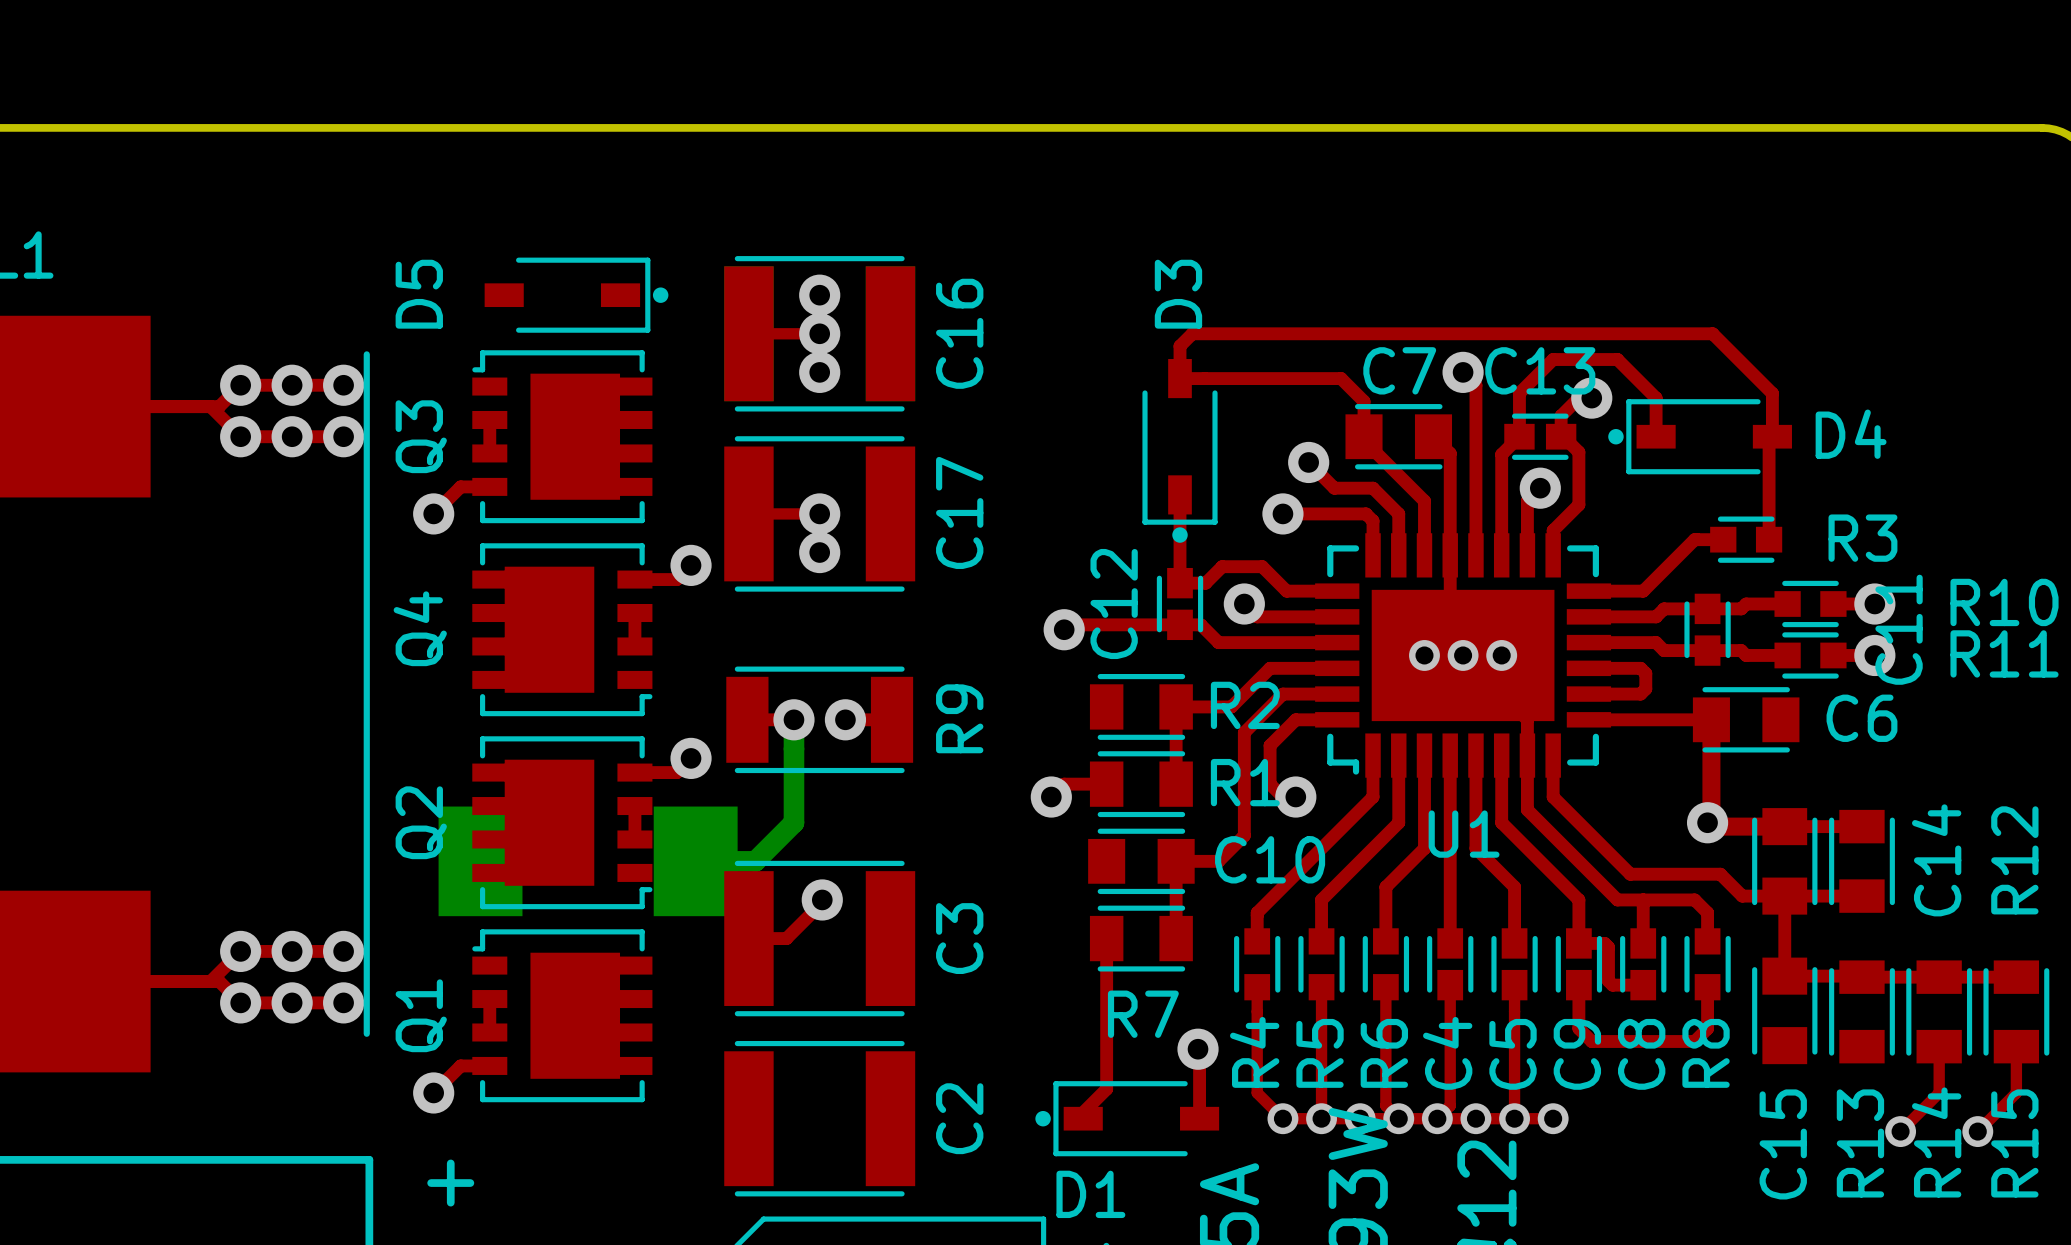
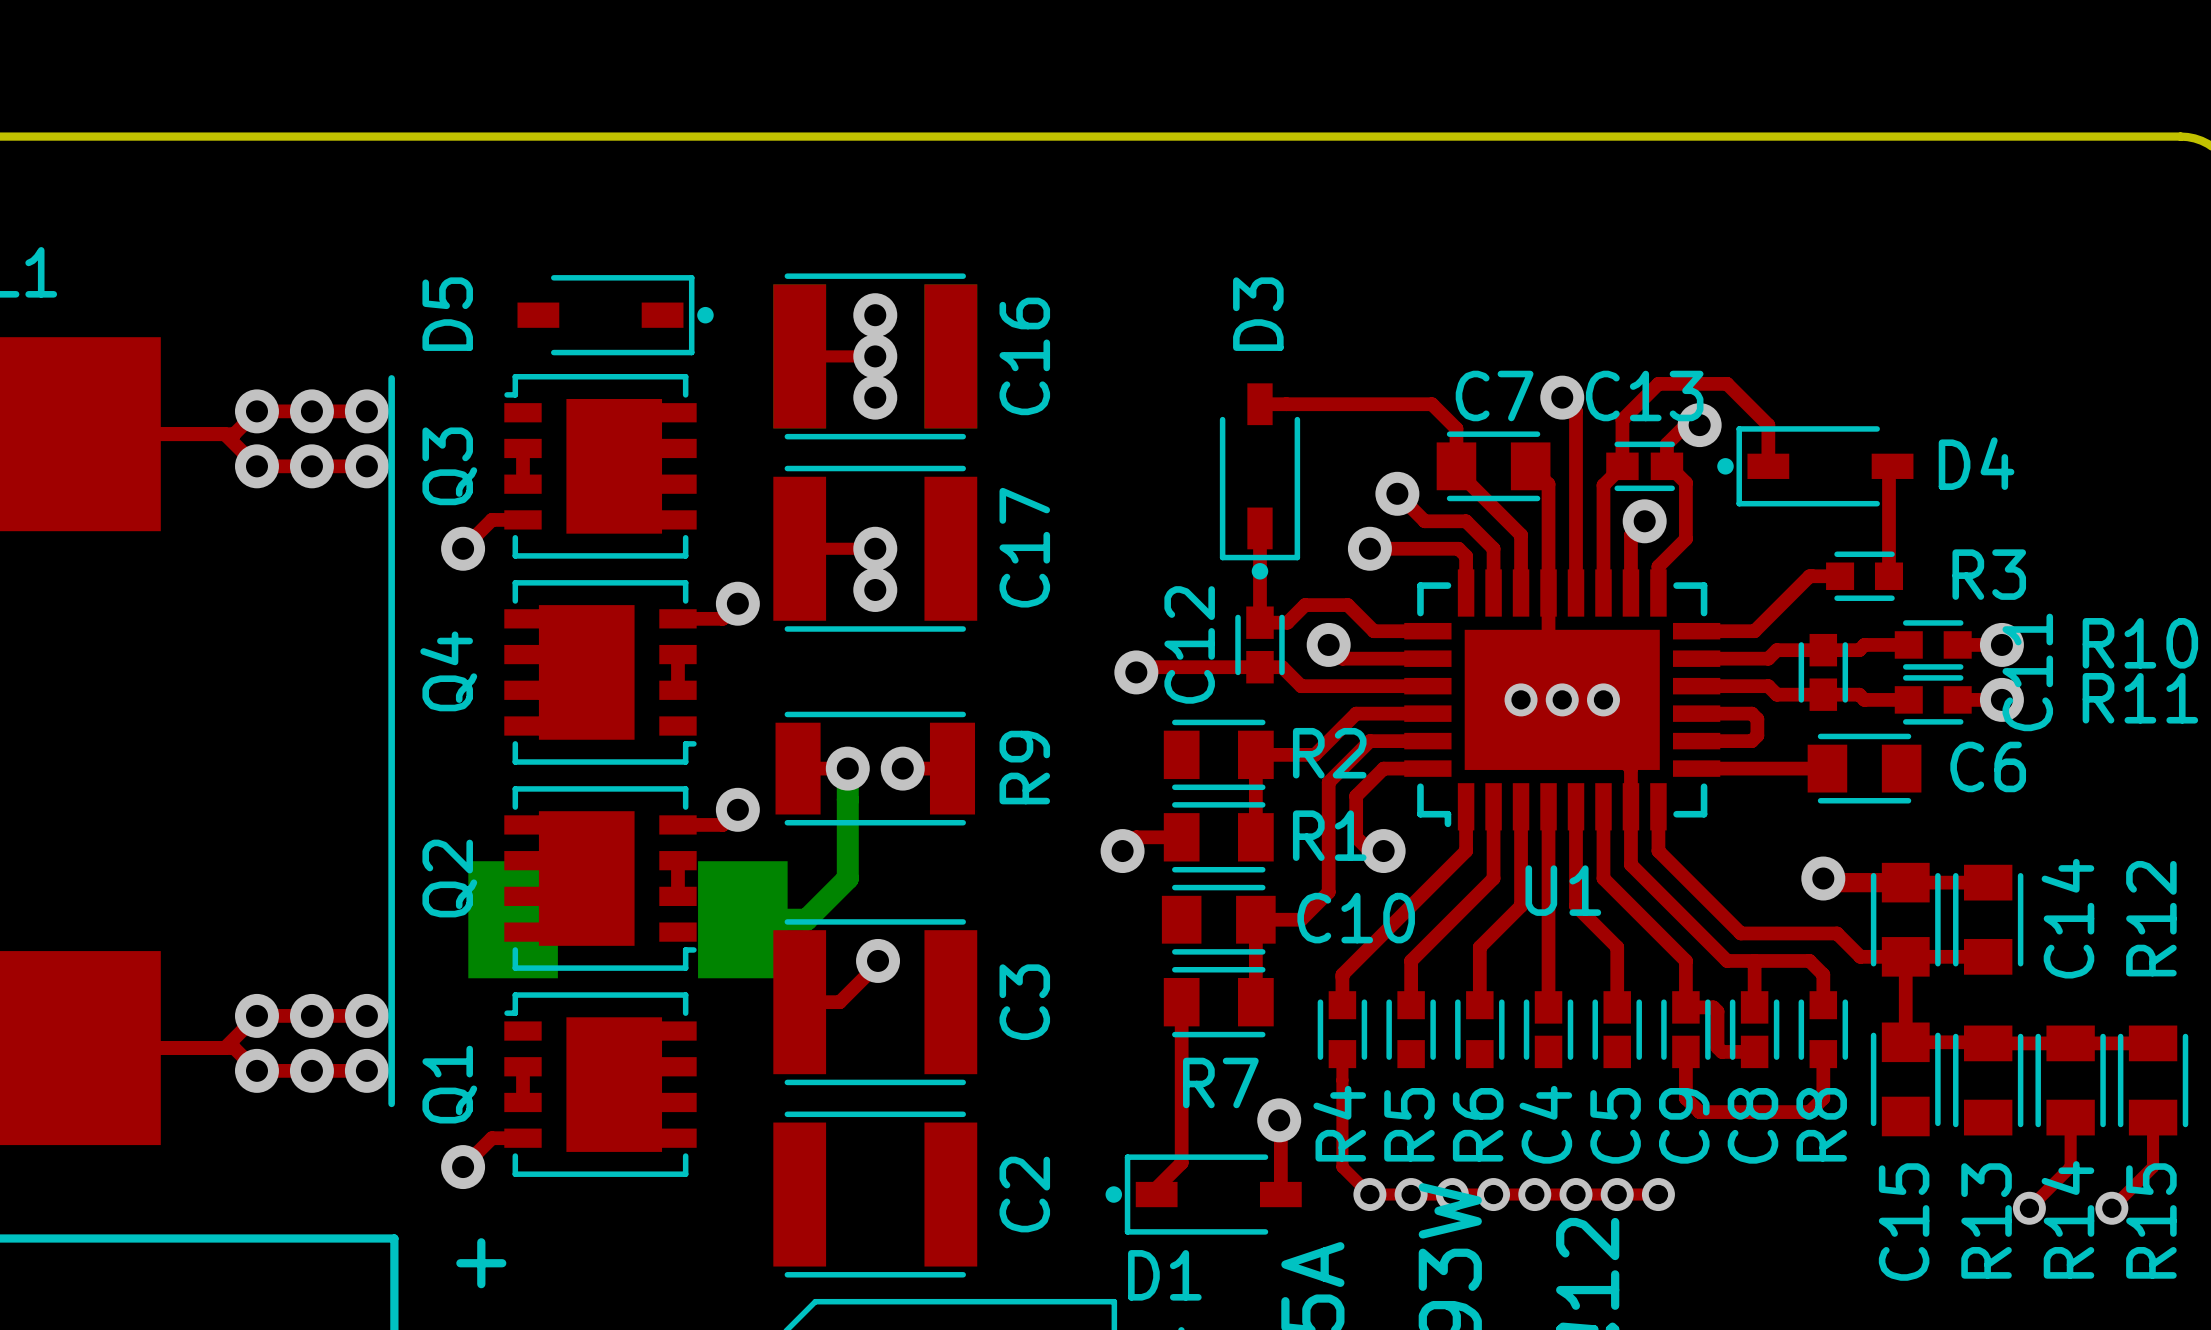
top track: (1180, 378) (1180, 346) (1192, 333) (1712, 333) (1772, 393) (1772, 436) -> none
top track: (1711, 719) (1711, 818) (1707, 822) -> none
top track: (1450, 985) (1450, 1105) (1437, 1118) -> none
top track: (1514, 985) (1514, 1118) -> none
top track: (1321, 987) (1321, 1118) -> none
top track: (1385, 987) (1385, 1105) (1398, 1118) -> none

